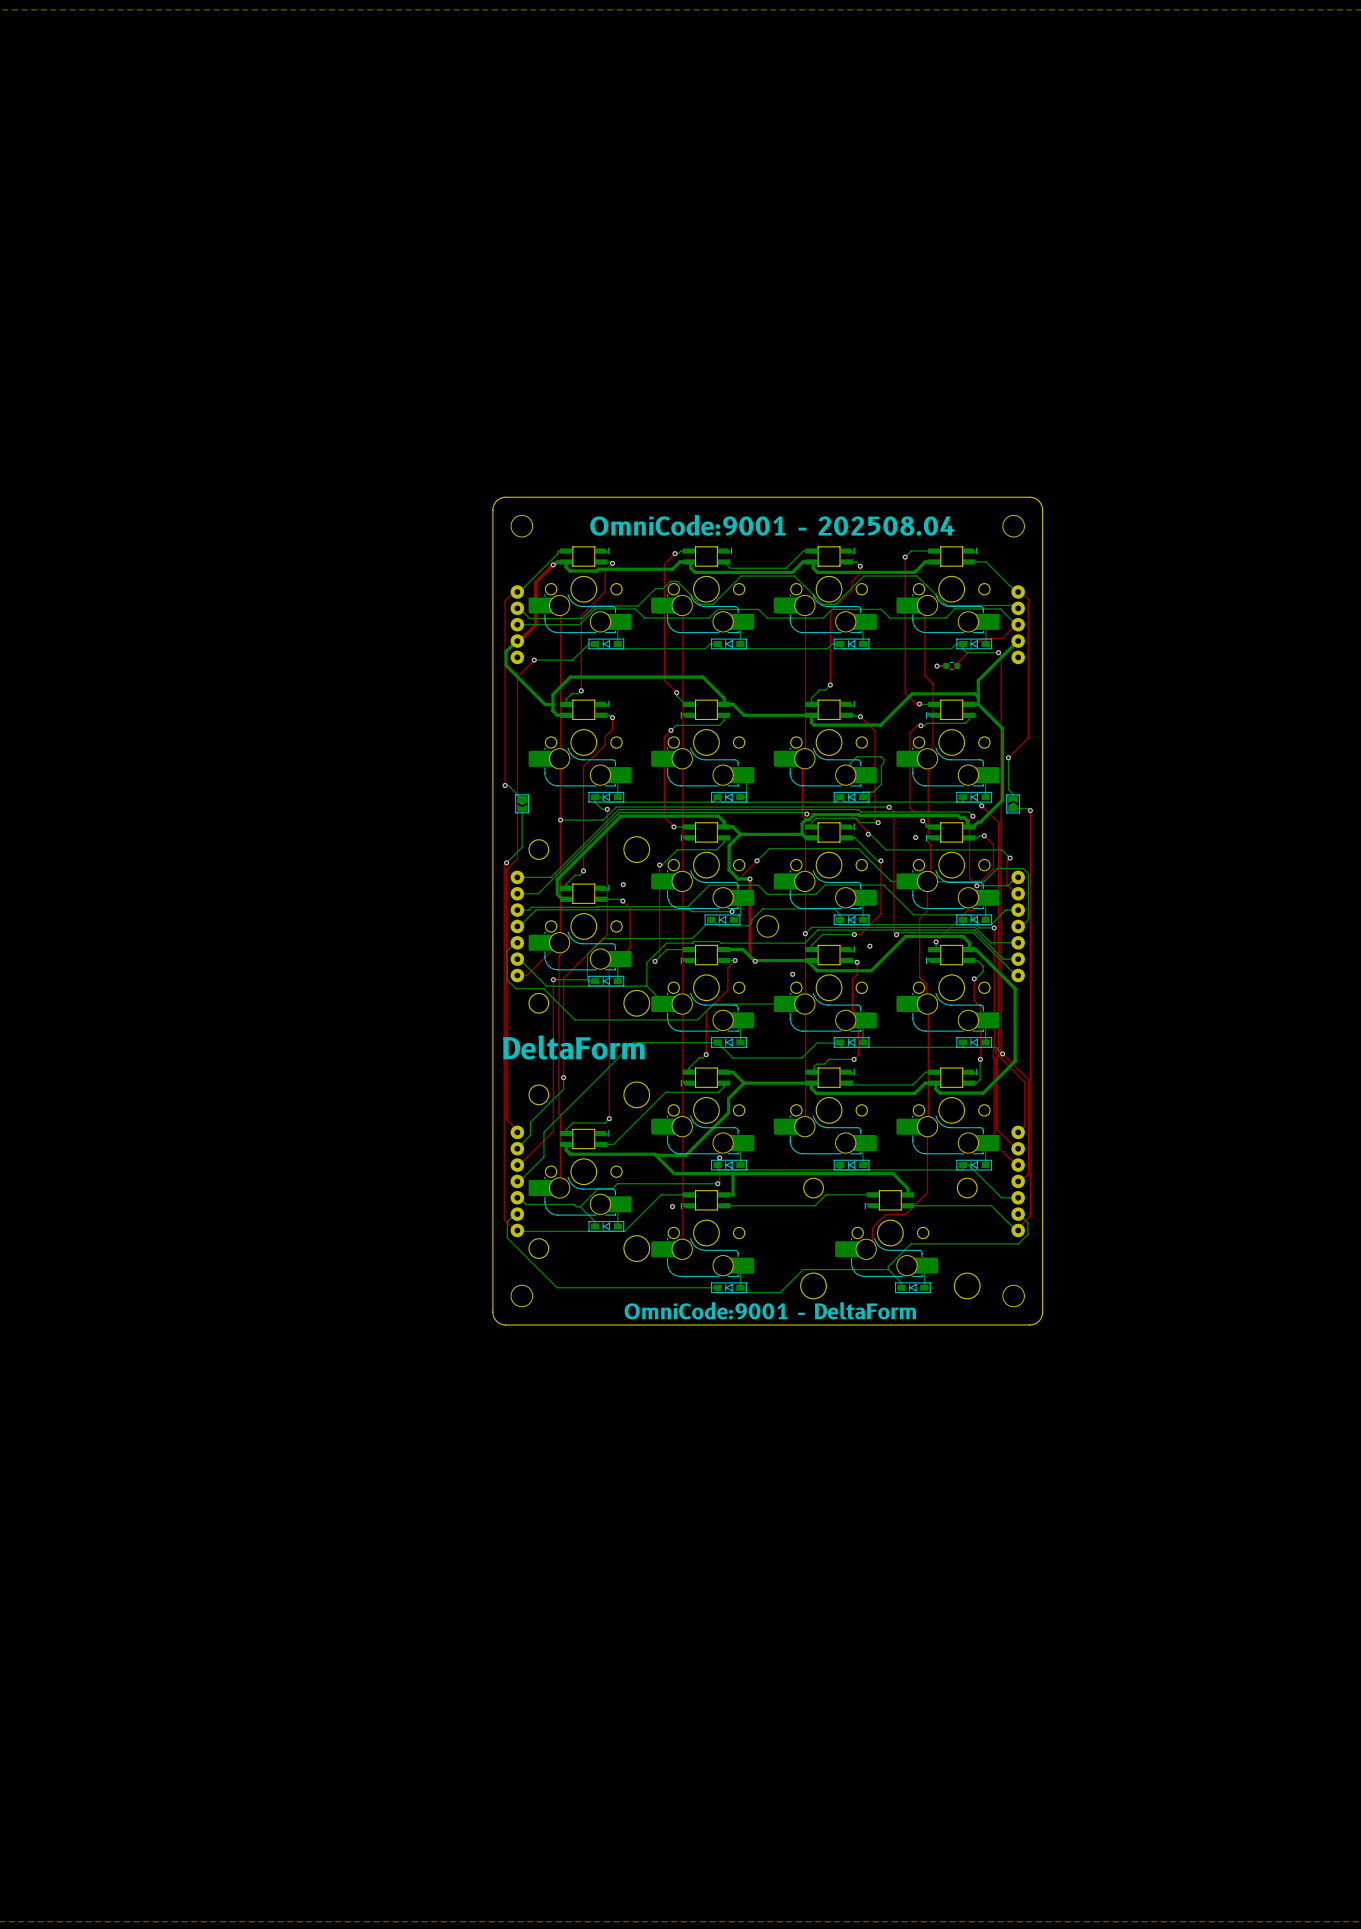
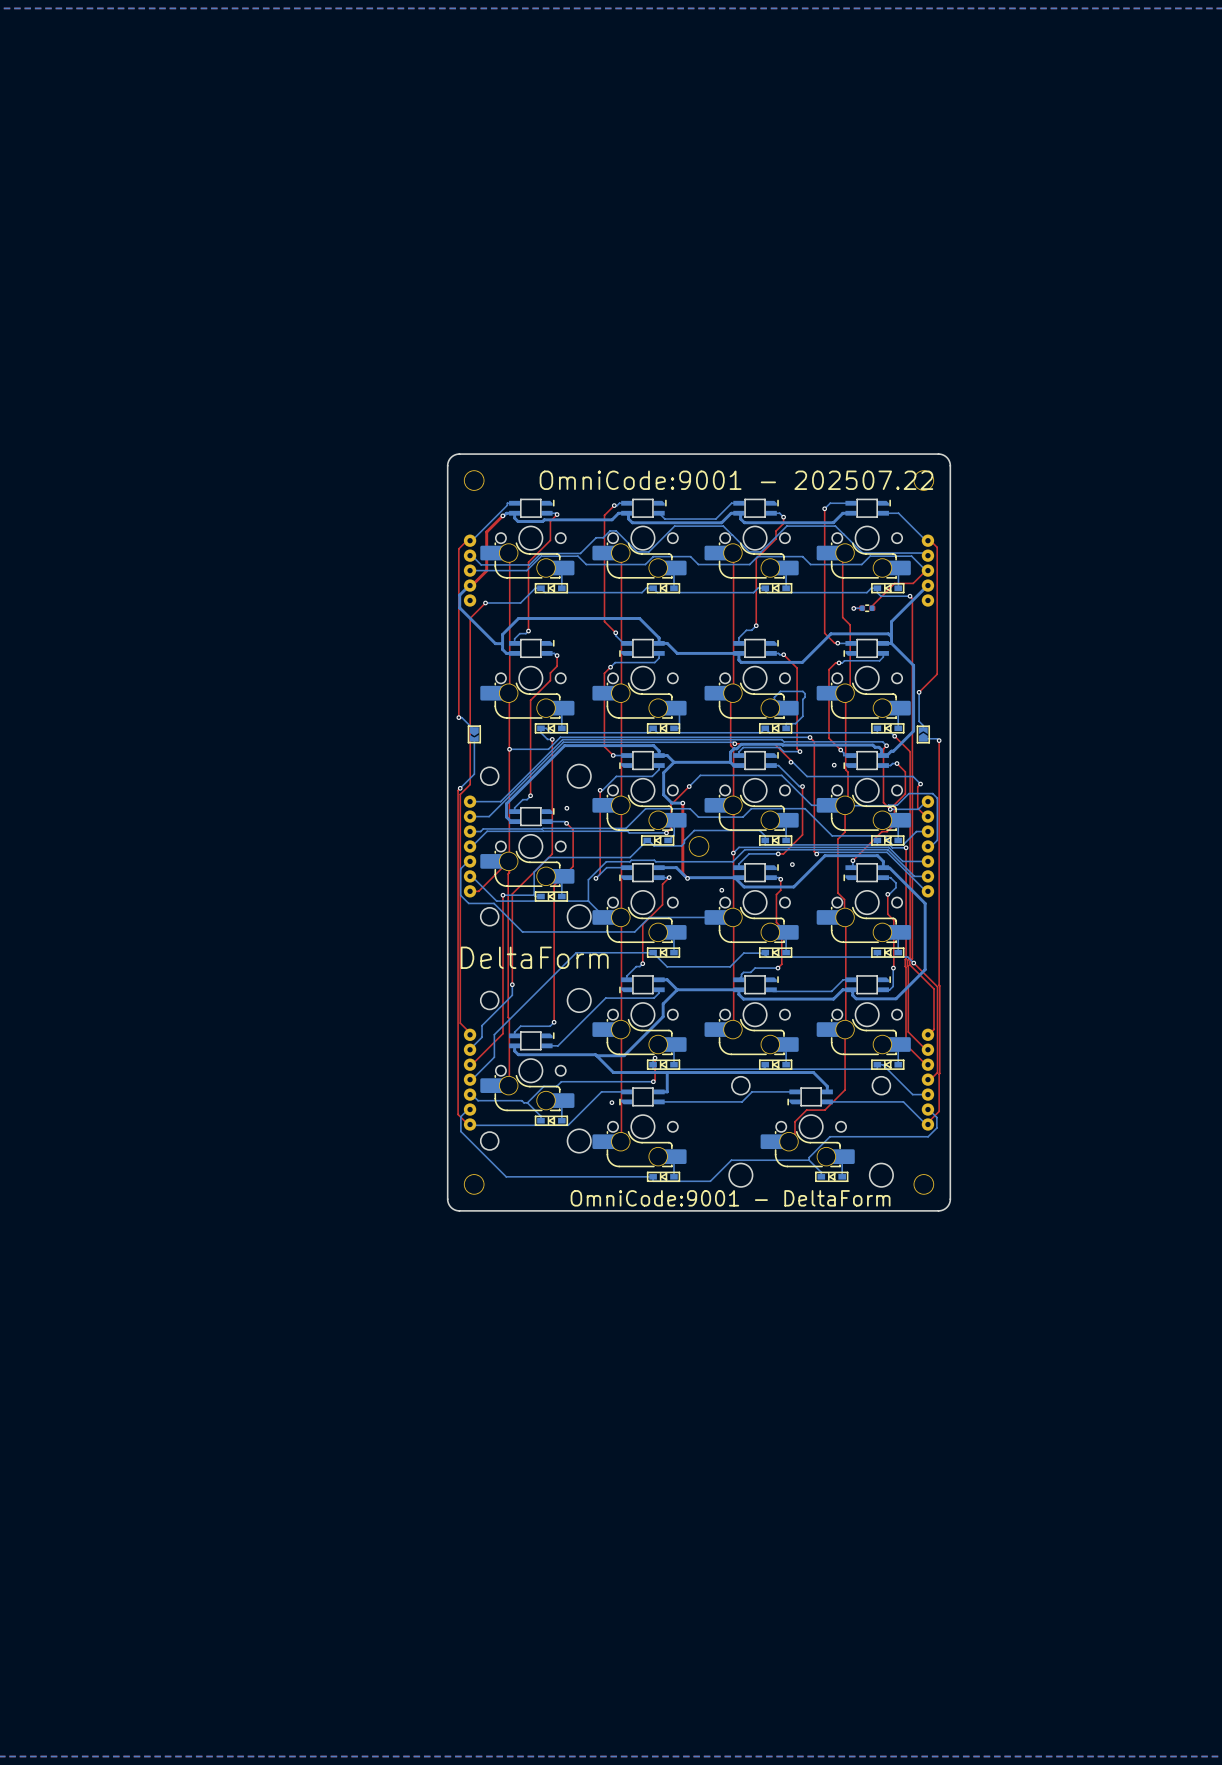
text: OmniCode:9001 - 202508.04 (772, 525) -> OmniCode:9001 - 202507.22 (736, 480)

